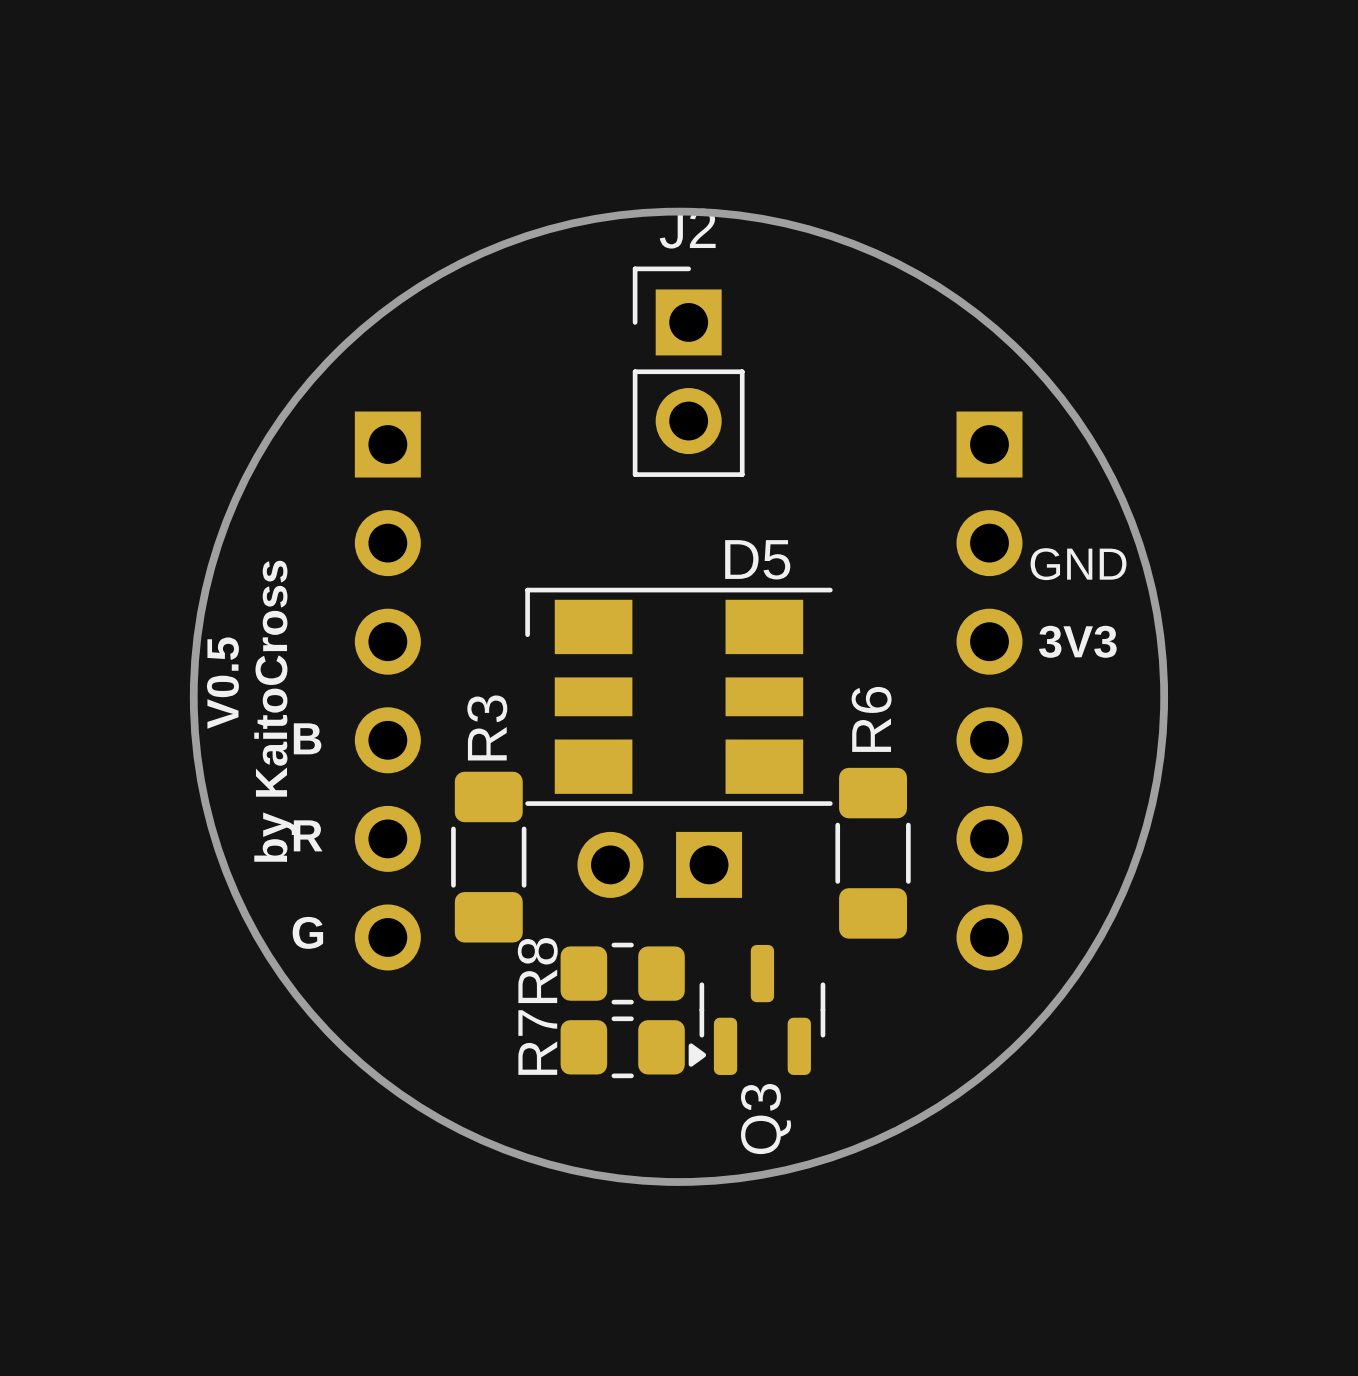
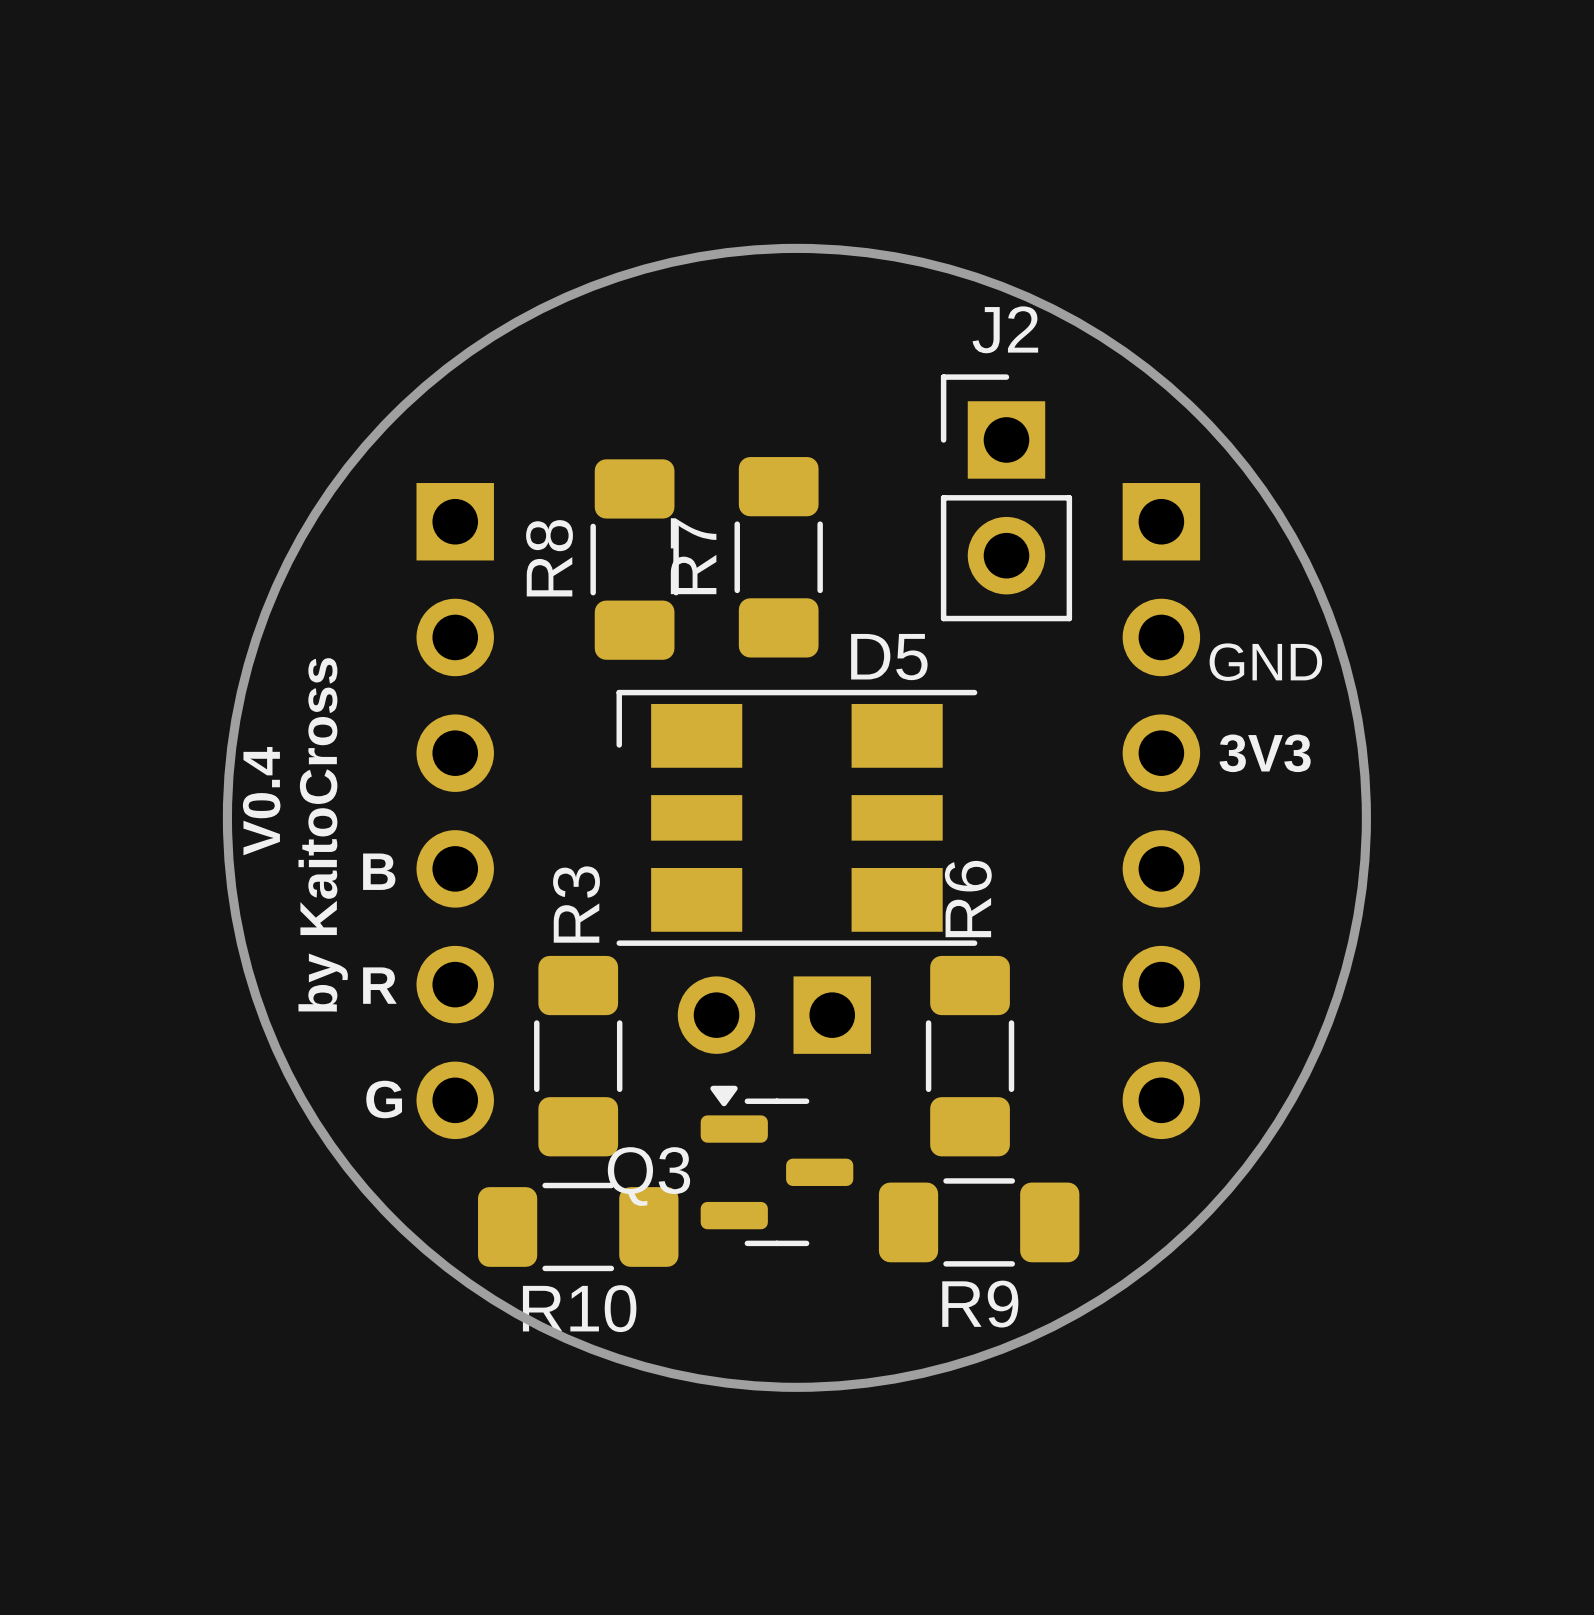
J2 position: (688, 371) -> (1006, 497)
text: V0.5 (222, 683) -> V0.4 (261, 801)
text position: B (307, 738) -> B (379, 871)
text position: R (308, 835) -> R (379, 985)
R6 position: (873, 853) -> (970, 1056)
R3 position: (488, 857) -> (578, 1056)
text position: G (307, 932) -> G (384, 1099)
R8 footprint: [560, 942, 685, 1005] -> [590, 459, 679, 660]
Q3 rotation: 0° (756, 1009) -> 90° clockwise (776, 1165)
Q3 position: (756, 1009) -> (776, 1165)
R7 footprint: [560, 1016, 685, 1079] -> [734, 457, 823, 658]
R9: none -> (979, 1222)
R10: none -> (578, 1226)

